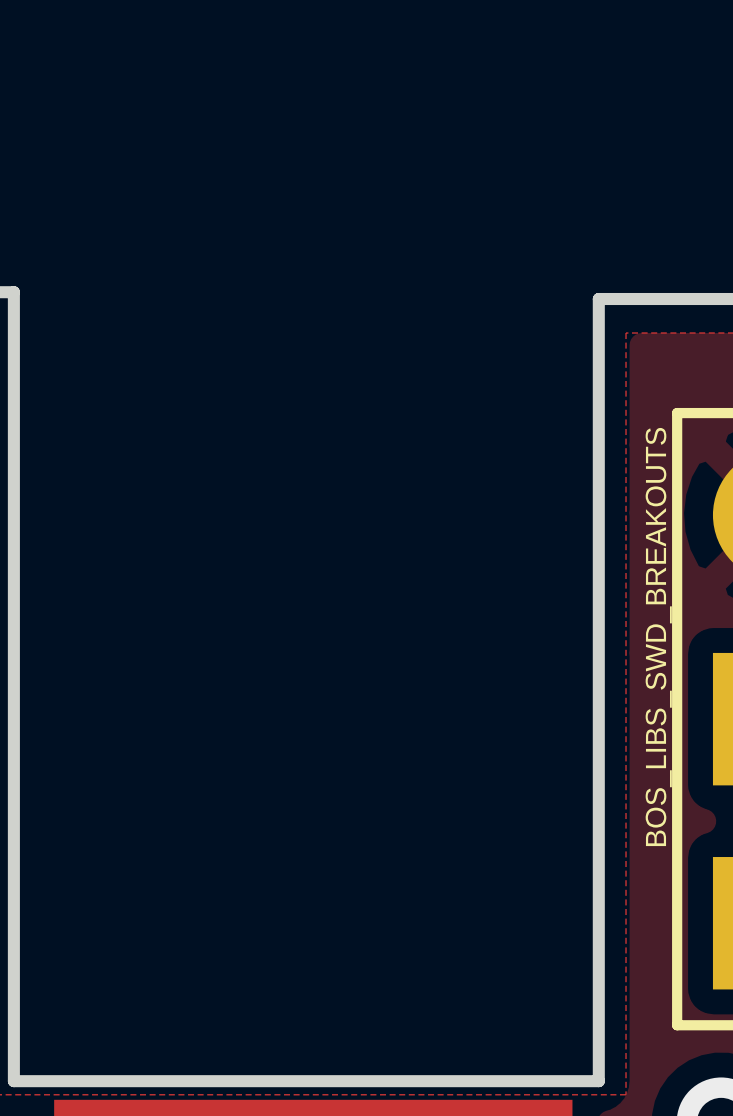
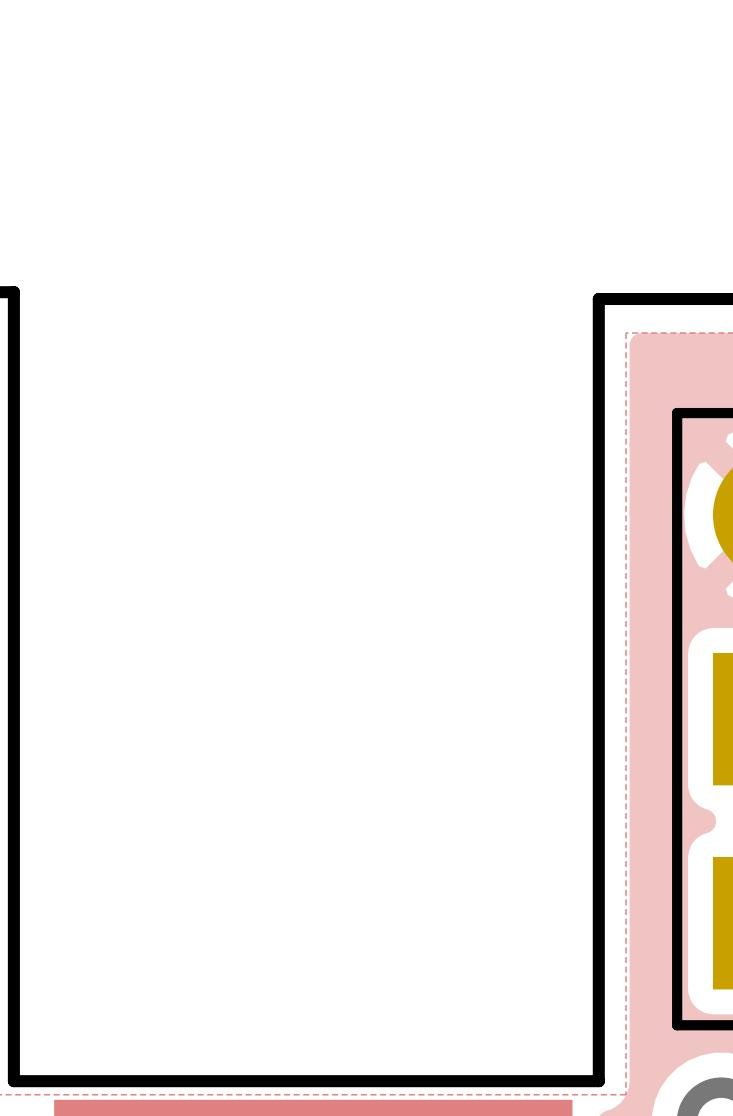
part value: BOS_LIBS_SWD_BREAKOUTS (658, 637) -> none

